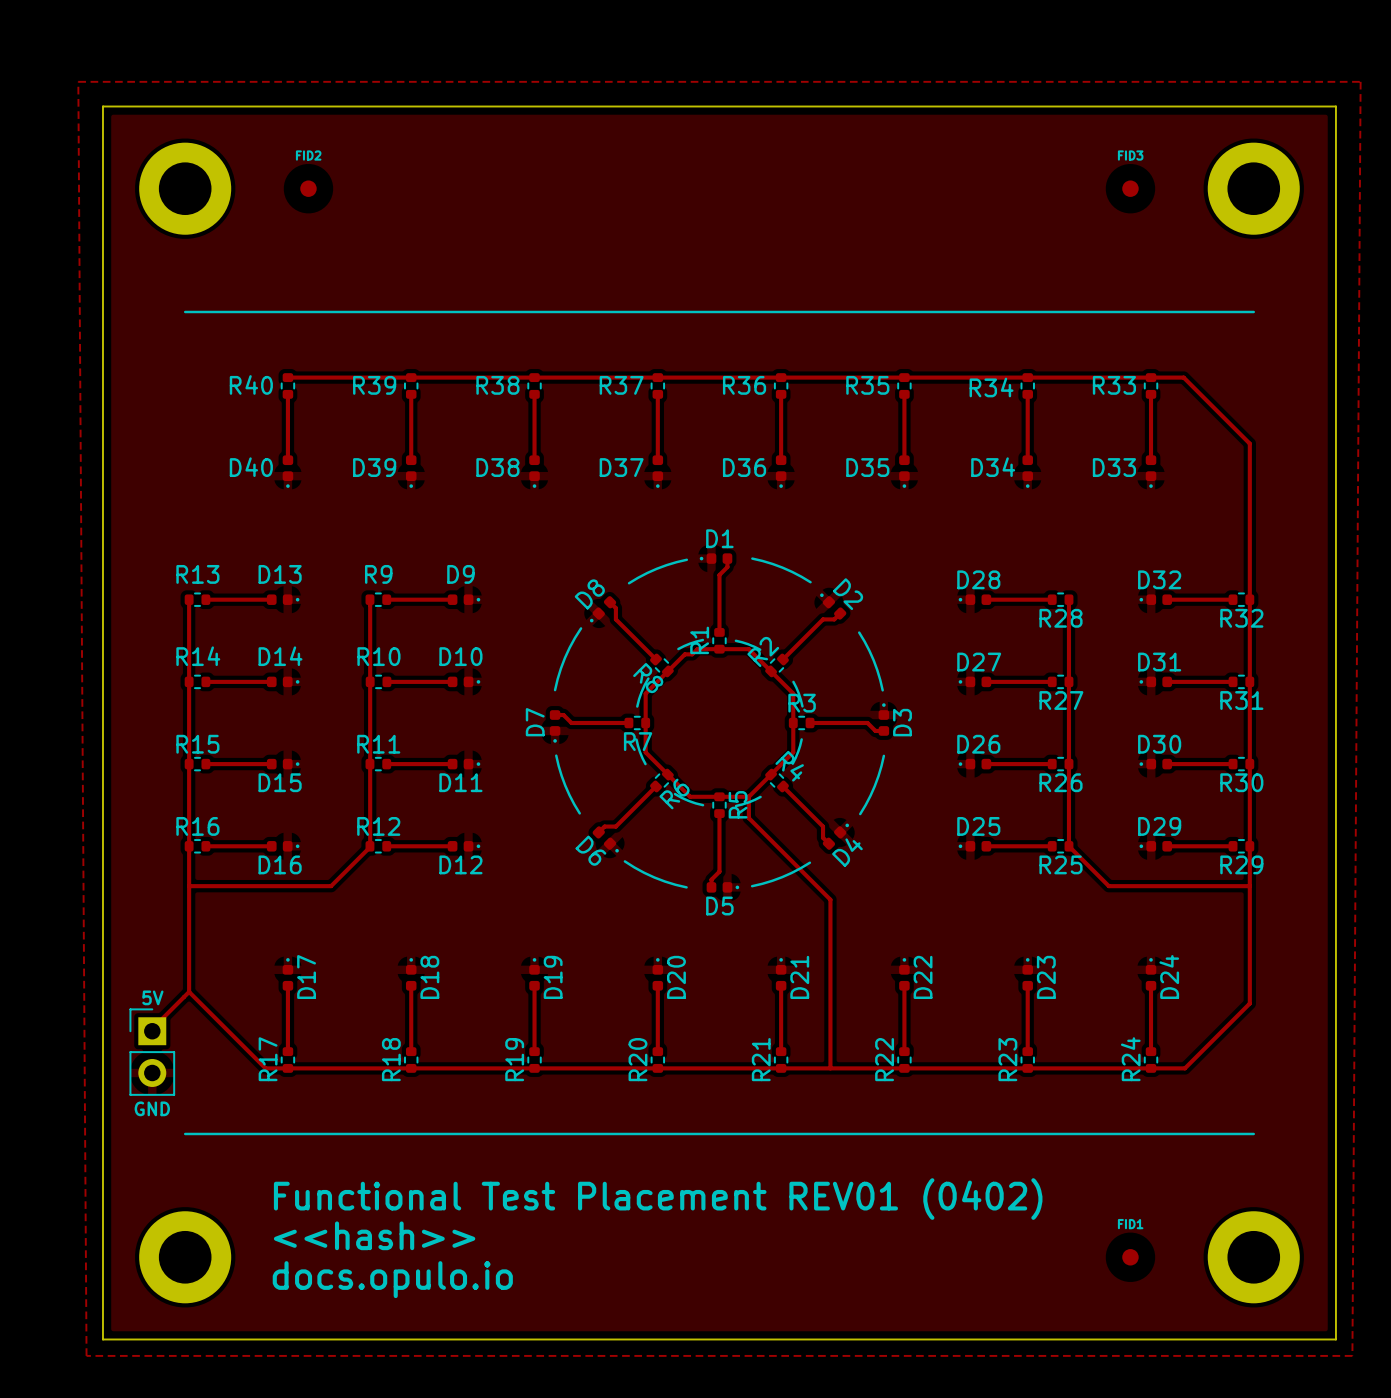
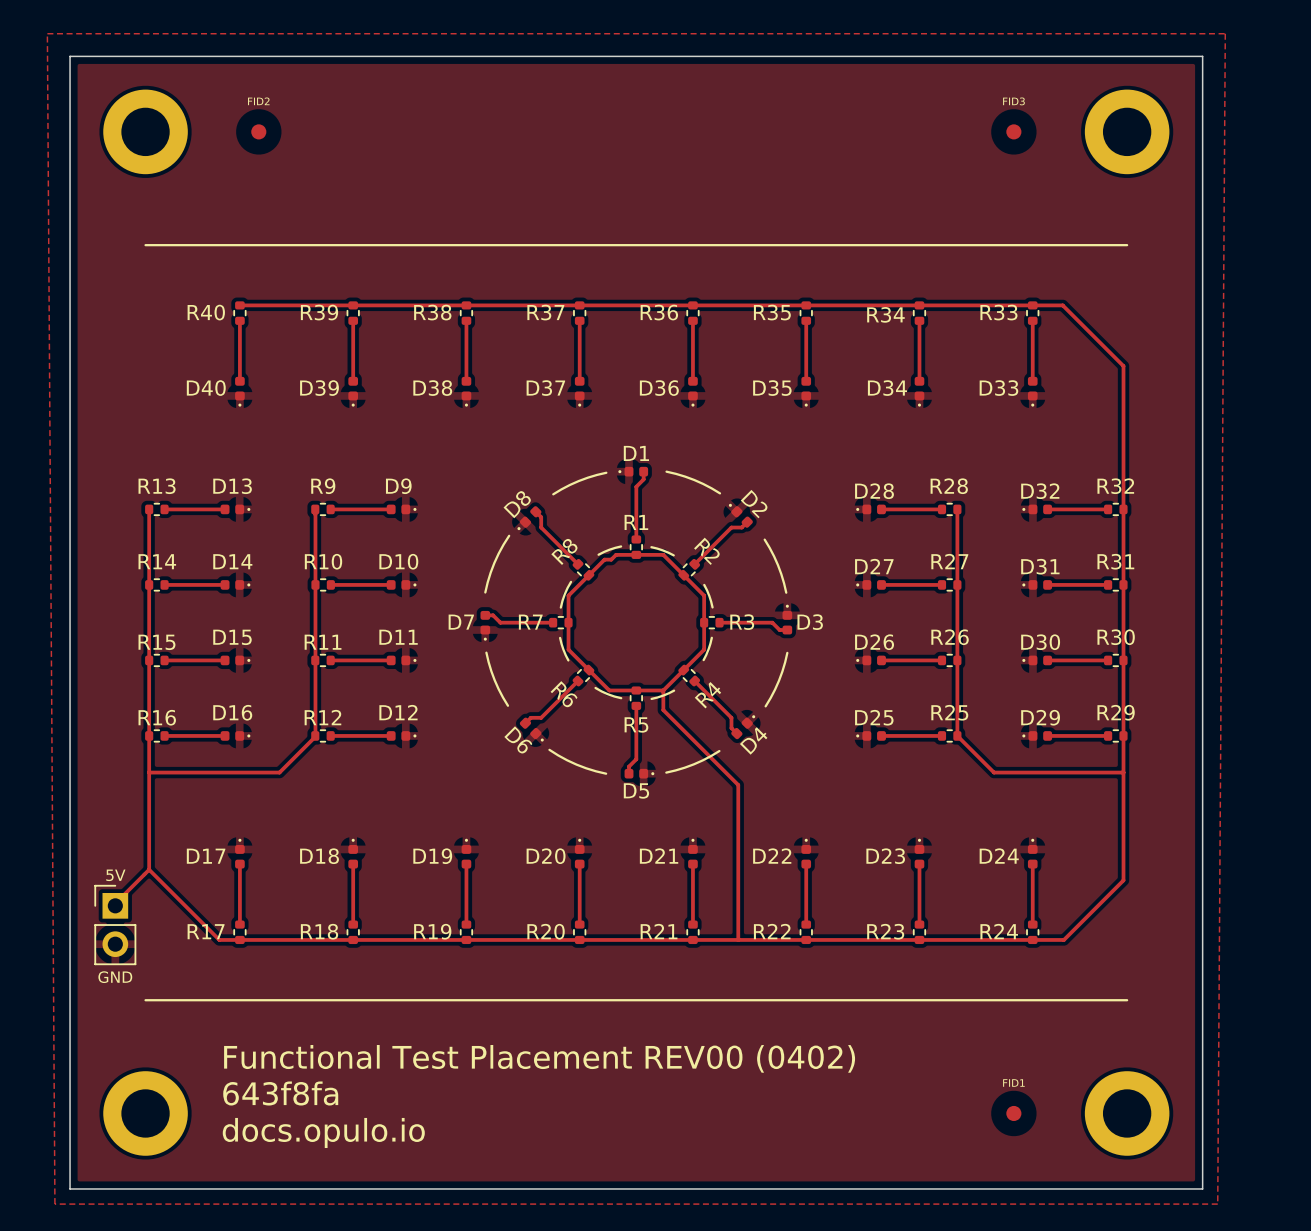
R28 name position: R28 (1060, 618) -> R28 (949, 486)
R32 name position: R32 (1241, 618) -> R32 (1115, 486)
R1 name rotation: 0° (699, 640) -> 90° clockwise (636, 522)
R2 name rotation: 0° (763, 651) -> 90° clockwise (706, 551)
R8 name rotation: 0° (648, 678) -> 90° counterclockwise (564, 551)
R27 name position: R27 (1061, 700) -> R27 (949, 561)
R31 name position: R31 (1241, 700) -> R31 (1115, 561)
R3 name position: R3 (802, 703) -> R3 (742, 622)
D7 name rotation: 0° (535, 722) -> 90° clockwise (461, 622)
D3 name rotation: 0° (902, 722) -> 90° clockwise (810, 622)
R7 name position: R7 (638, 741) -> R7 (530, 622)
R4 name rotation: 0° (789, 766) -> 90° counterclockwise (707, 695)
D15 name position: D15 (280, 782) -> D15 (232, 637)
D11 name position: D11 (460, 782) -> D11 (398, 637)
R26 name position: R26 (1060, 782) -> R26 (950, 637)
R30 name position: R30 (1241, 782) -> R30 (1116, 637)
R6 name rotation: 0° (674, 793) -> 90° clockwise (564, 694)
R5 name rotation: 0° (738, 804) -> 90° clockwise (636, 724)
D16 name position: D16 (280, 864) -> D16 (232, 712)
D12 name position: D12 (460, 864) -> D12 (398, 712)
R25 name position: R25 (1060, 864) -> R25 (949, 712)
R29 name position: R29 (1241, 864) -> R29 (1116, 712)
D17 name rotation: 0° (306, 977) -> 90° clockwise (206, 856)
D18 name rotation: 0° (429, 977) -> 90° clockwise (319, 856)
D19 name rotation: 0° (553, 977) -> 90° clockwise (432, 856)
D20 name rotation: 0° (676, 977) -> 90° clockwise (546, 856)
D21 name rotation: 0° (799, 977) -> 90° clockwise (659, 856)
D22 name rotation: 0° (923, 977) -> 90° clockwise (772, 856)
D23 name rotation: 0° (1046, 977) -> 90° clockwise (885, 856)
D24 name rotation: 0° (1169, 977) -> 90° clockwise (999, 856)
R17 name rotation: 0° (268, 1059) -> 90° clockwise (206, 931)
R18 name rotation: 0° (391, 1059) -> 90° clockwise (319, 931)
R19 name rotation: 0° (514, 1059) -> 90° clockwise (432, 931)
R20 name rotation: 0° (637, 1059) -> 90° clockwise (546, 931)
R21 name rotation: 0° (761, 1059) -> 90° clockwise (659, 931)
R22 name rotation: 0° (884, 1059) -> 90° clockwise (772, 931)
R23 name rotation: 0° (1007, 1059) -> 90° clockwise (885, 931)
R24 name rotation: 0° (1130, 1059) -> 90° clockwise (999, 931)
text: Functional Test Placement REV01 (0402) (658, 1199) -> Functional Test Placement REV00 (0402) (539, 1058)
text: <<hash>> (374, 1235) -> 643f8fa (280, 1093)

